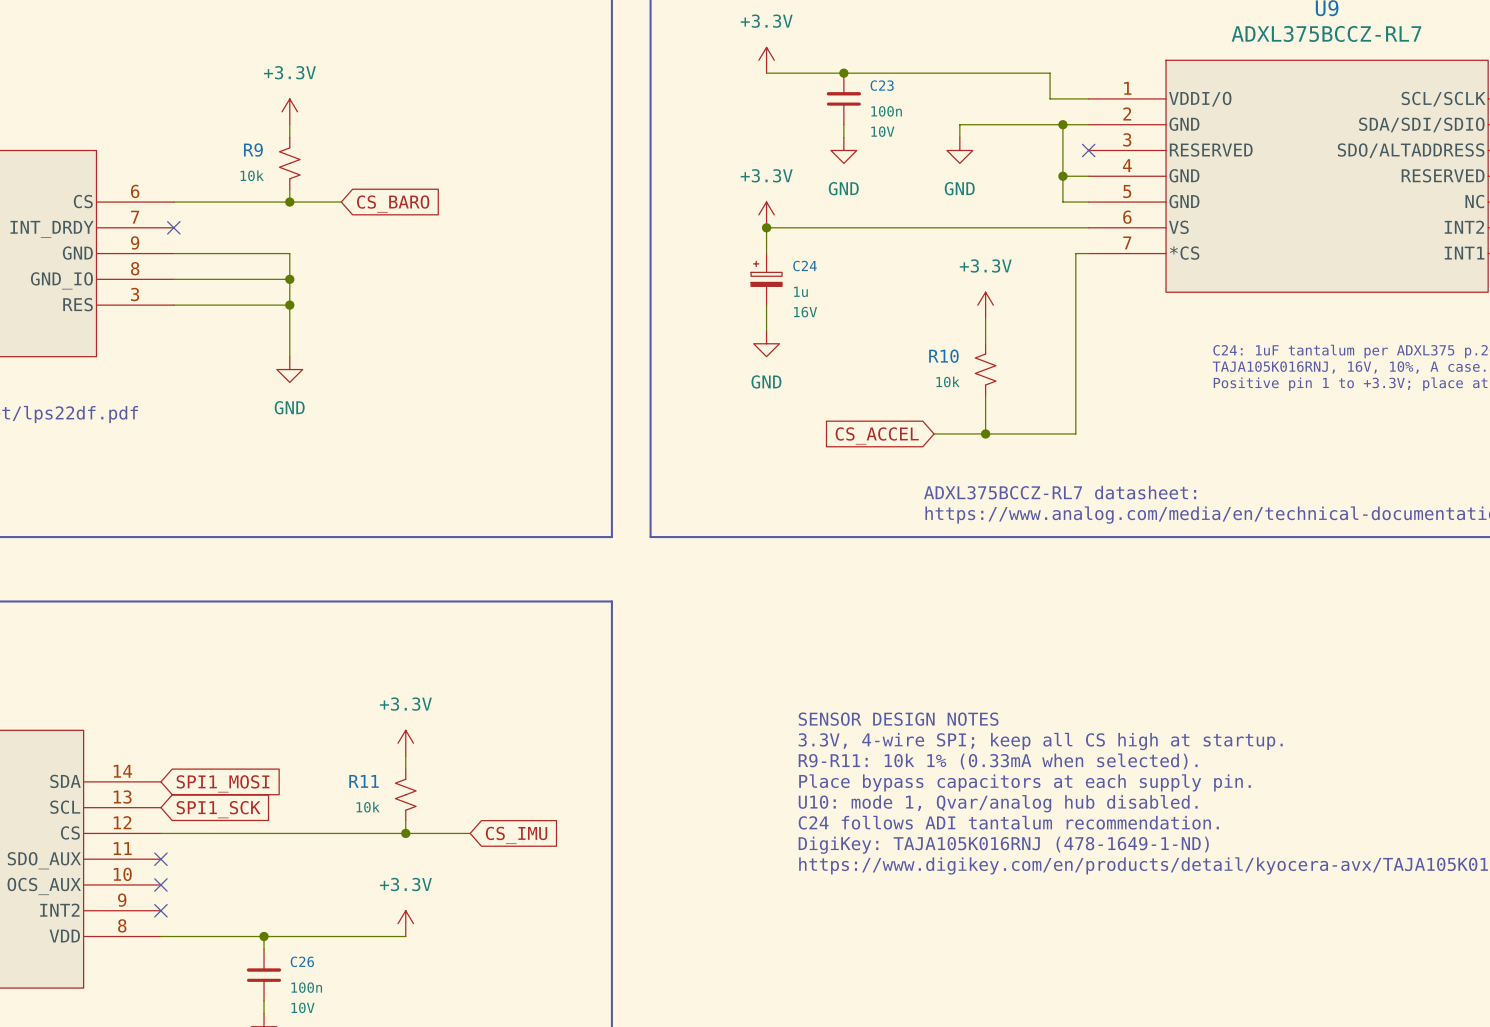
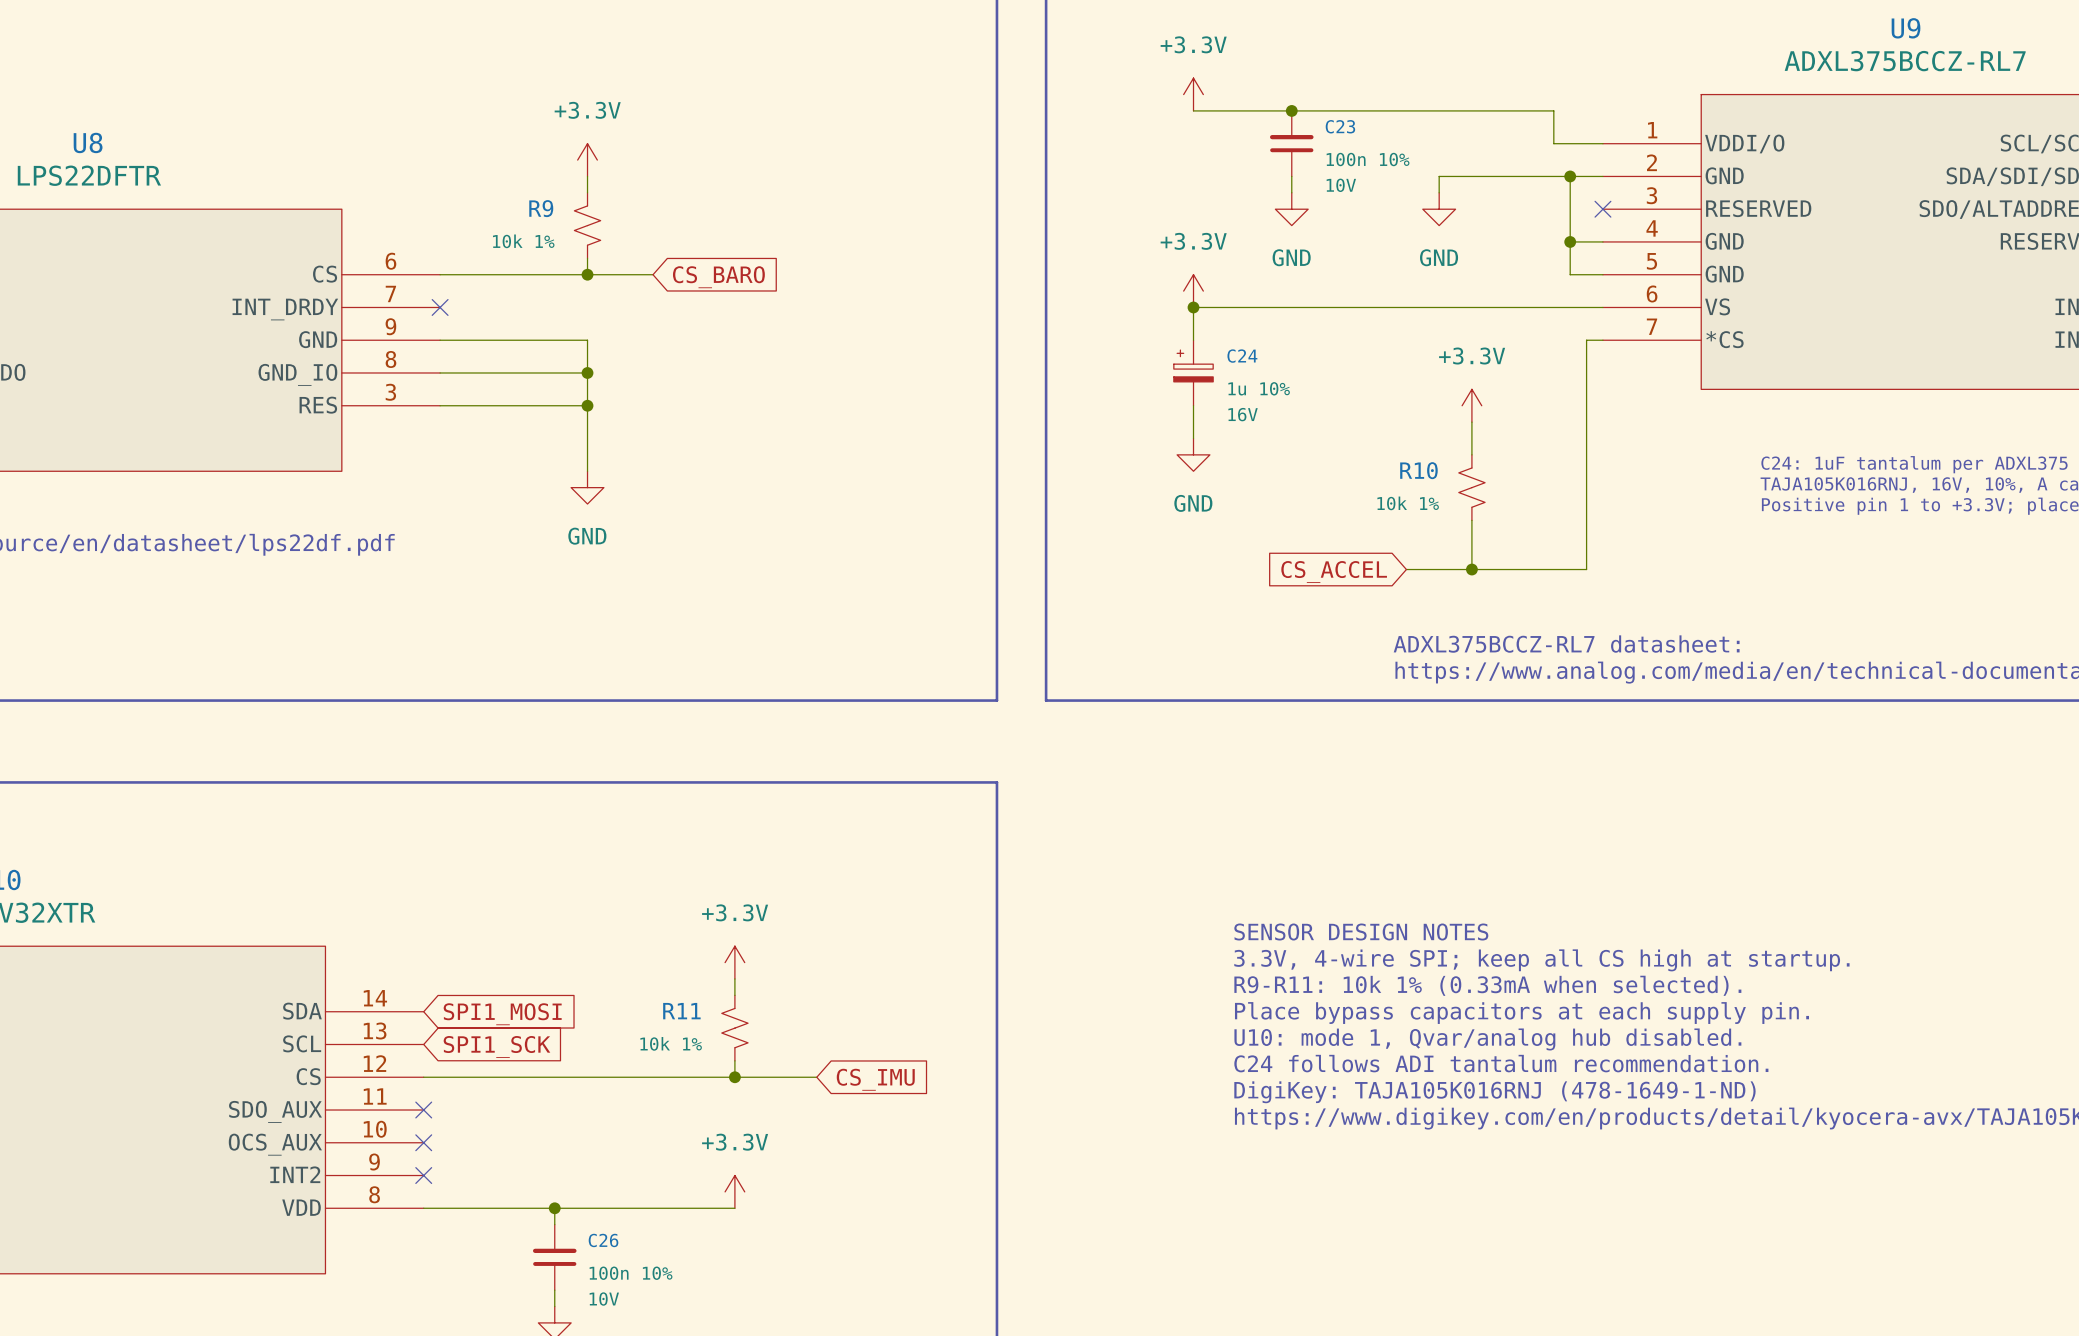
C23 value: 100n (886, 111) -> 100n 10% (1368, 159)
R9 value: 10k (252, 175) -> 10k 1% (523, 241)
C24 value: 1u (800, 291) -> 1u 10% (1259, 388)
R10 value: 10k (948, 381) -> 10k 1% (1408, 503)
R11 value: 10k (368, 807) -> 10k 1% (671, 1043)
C26 value: 100n (306, 987) -> 100n 10% (631, 1273)

